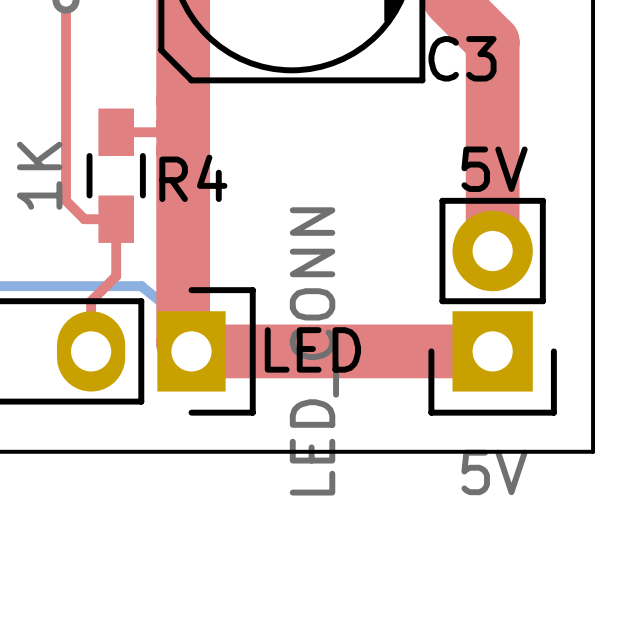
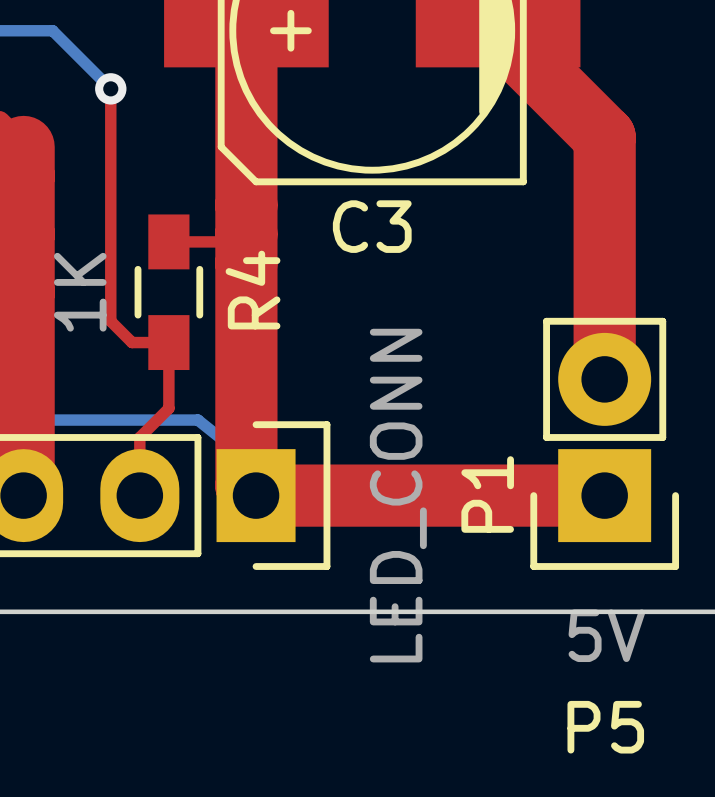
C3 name position: C3 (462, 58) -> C3 (372, 226)
5V name: 5V (494, 169) -> P5 (605, 727)
R4 name rotation: 0° (193, 178) -> 90° counterclockwise (253, 290)
LED name: LED (312, 349) -> P1 (487, 494)

